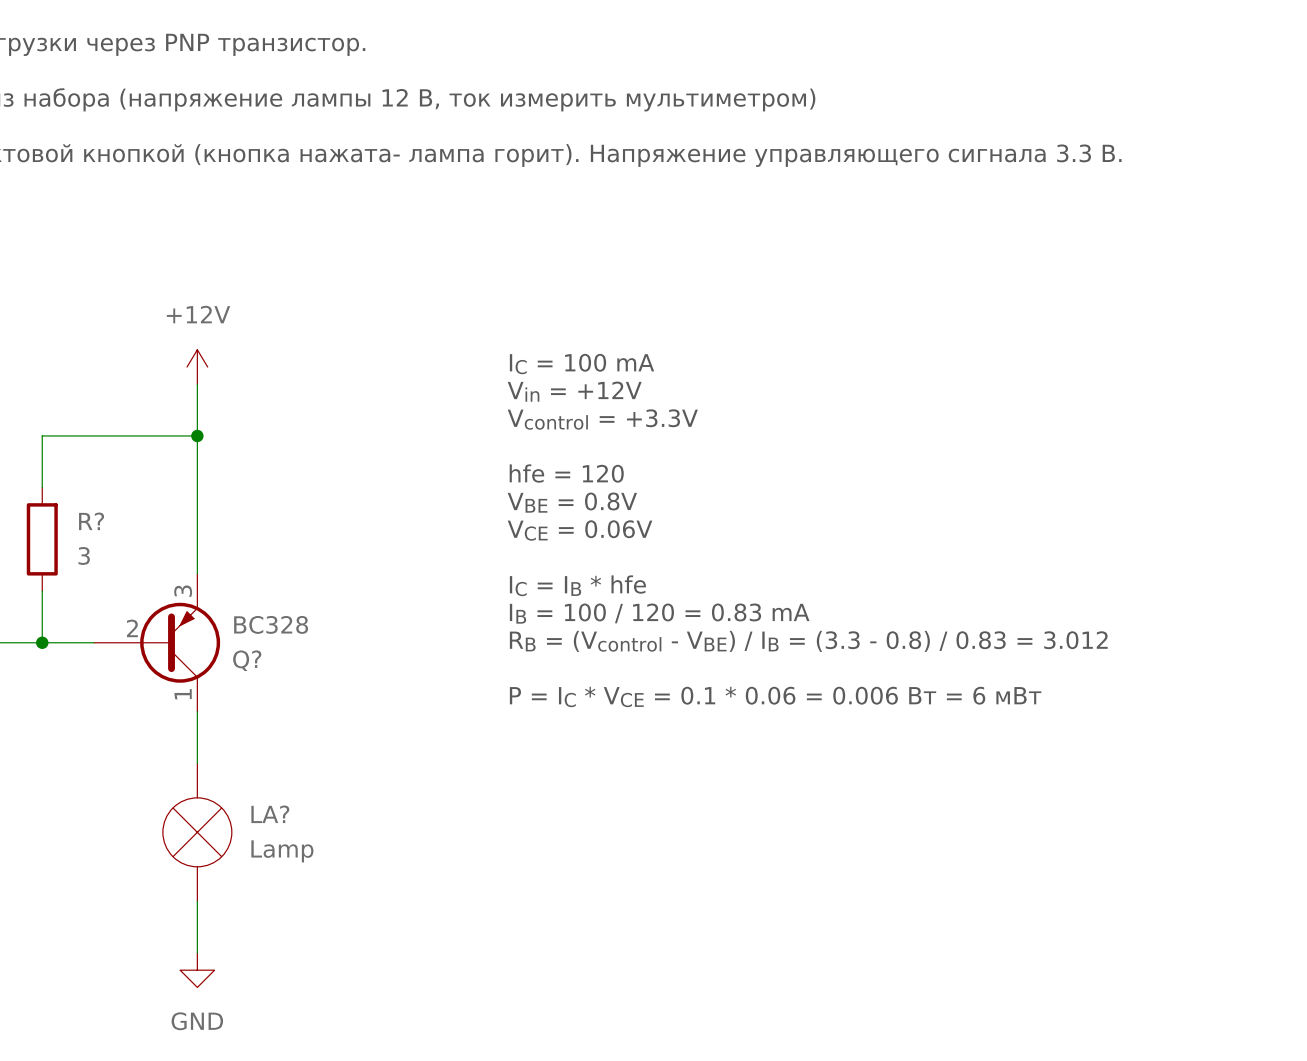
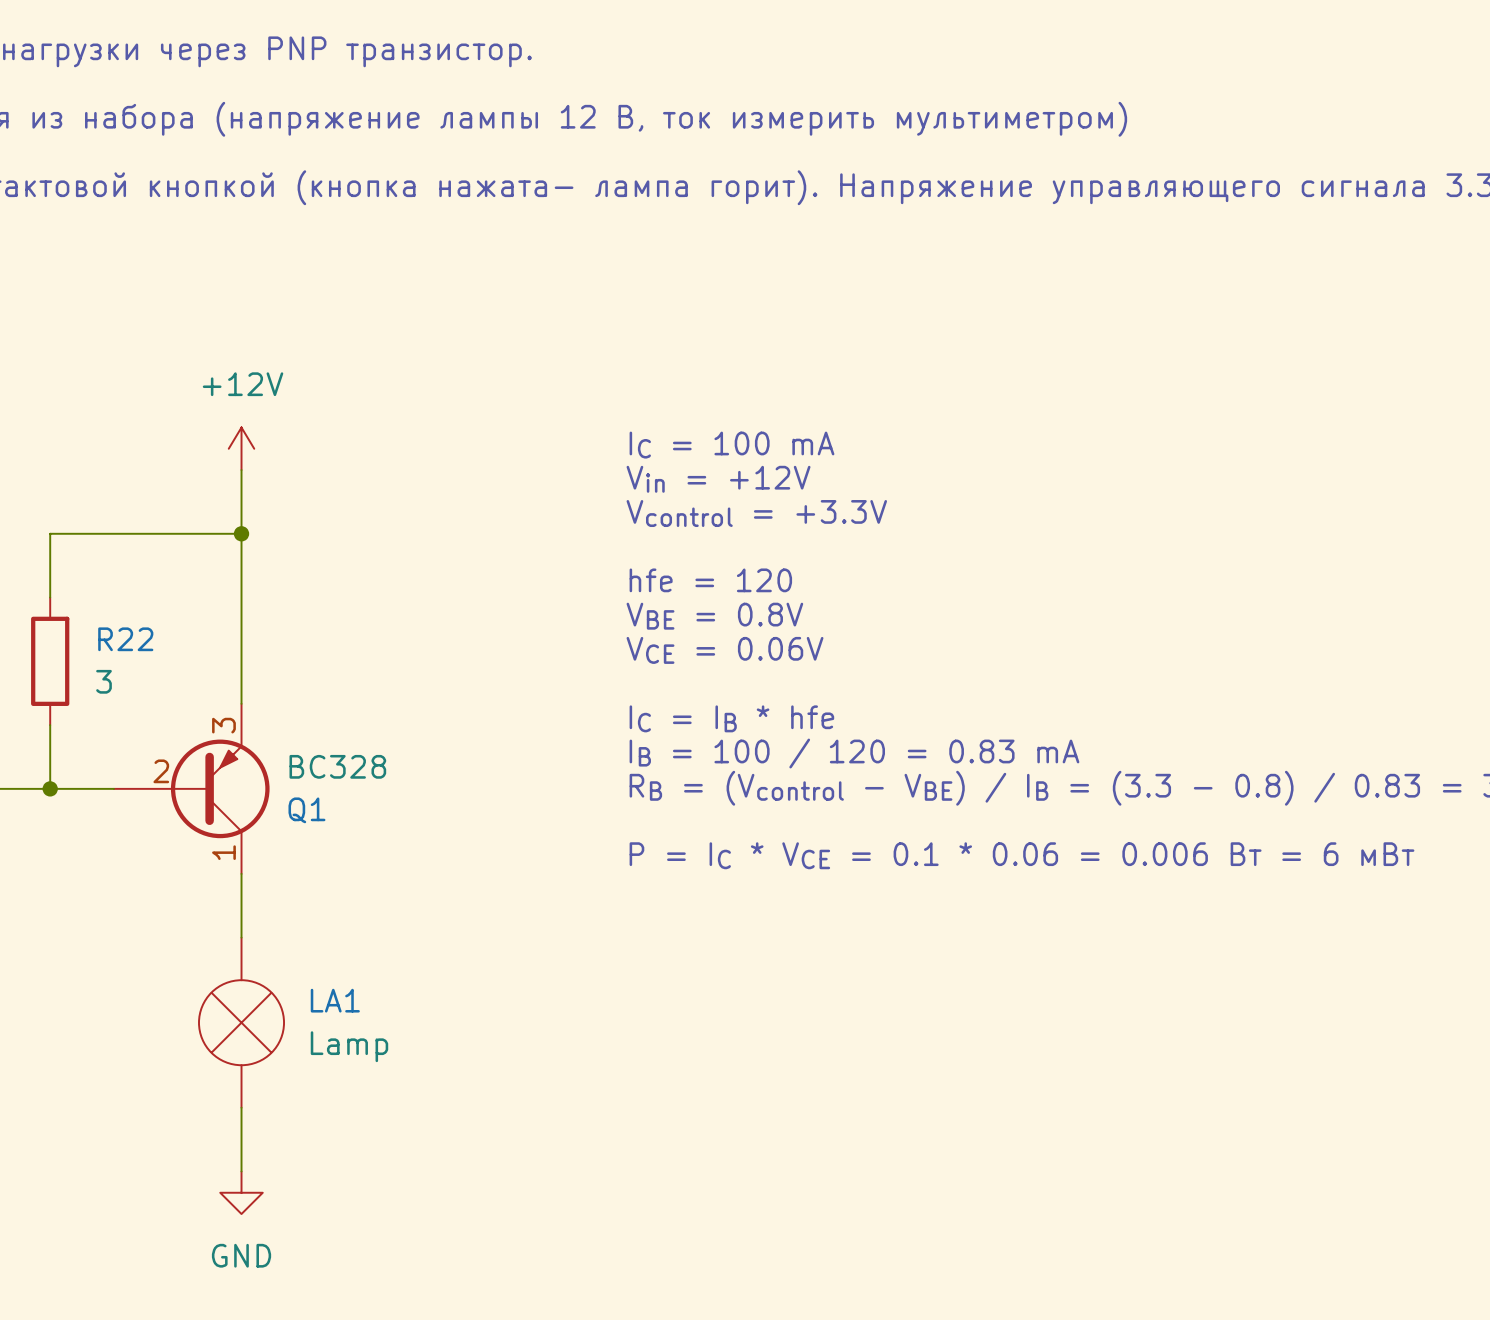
R? name: R? (91, 521) -> R22 (125, 639)
Q? name: Q? (247, 660) -> Q1 (306, 810)
LA? name: LA? (270, 814) -> LA1 (335, 1000)

